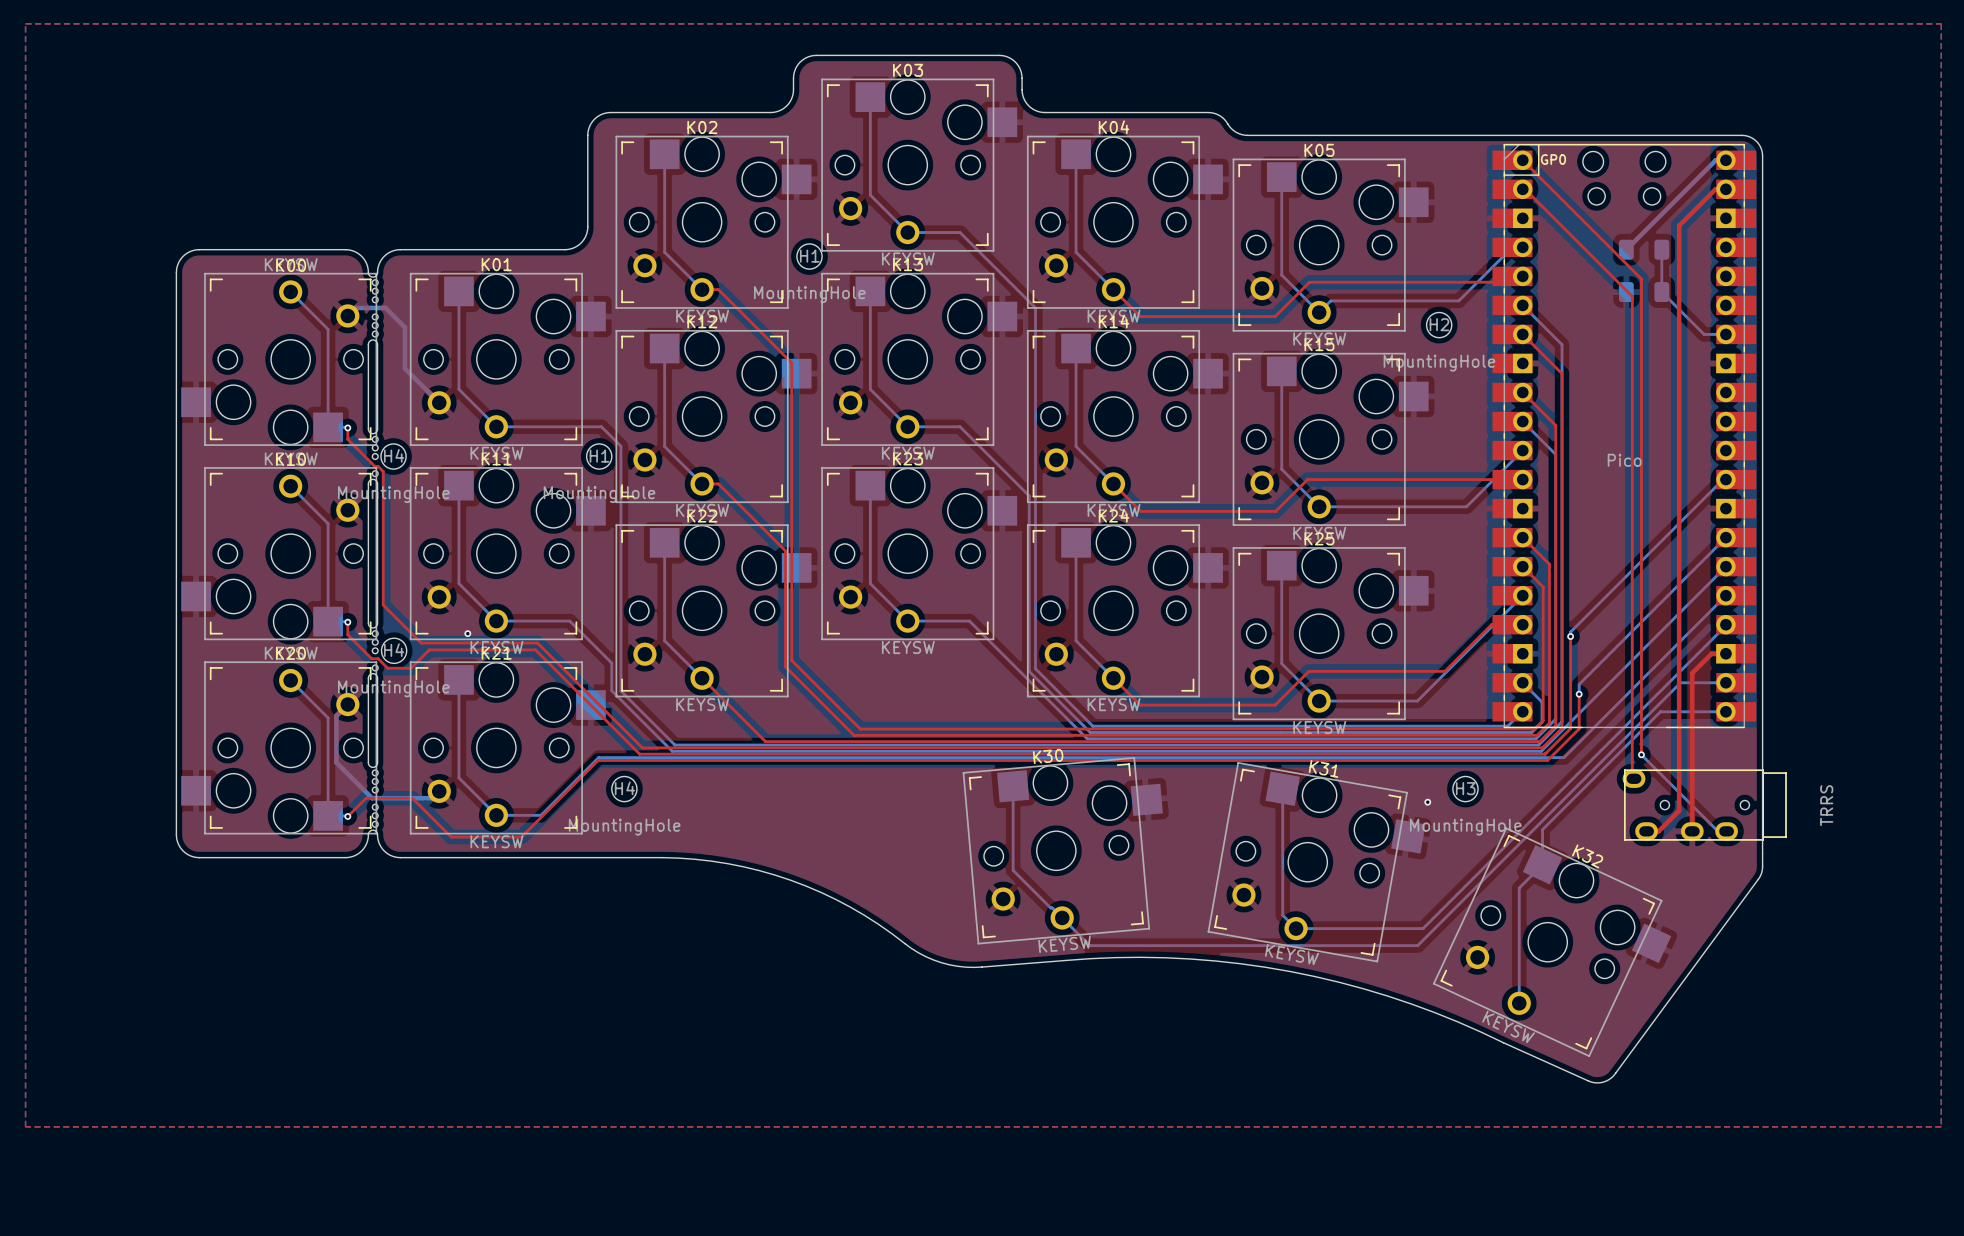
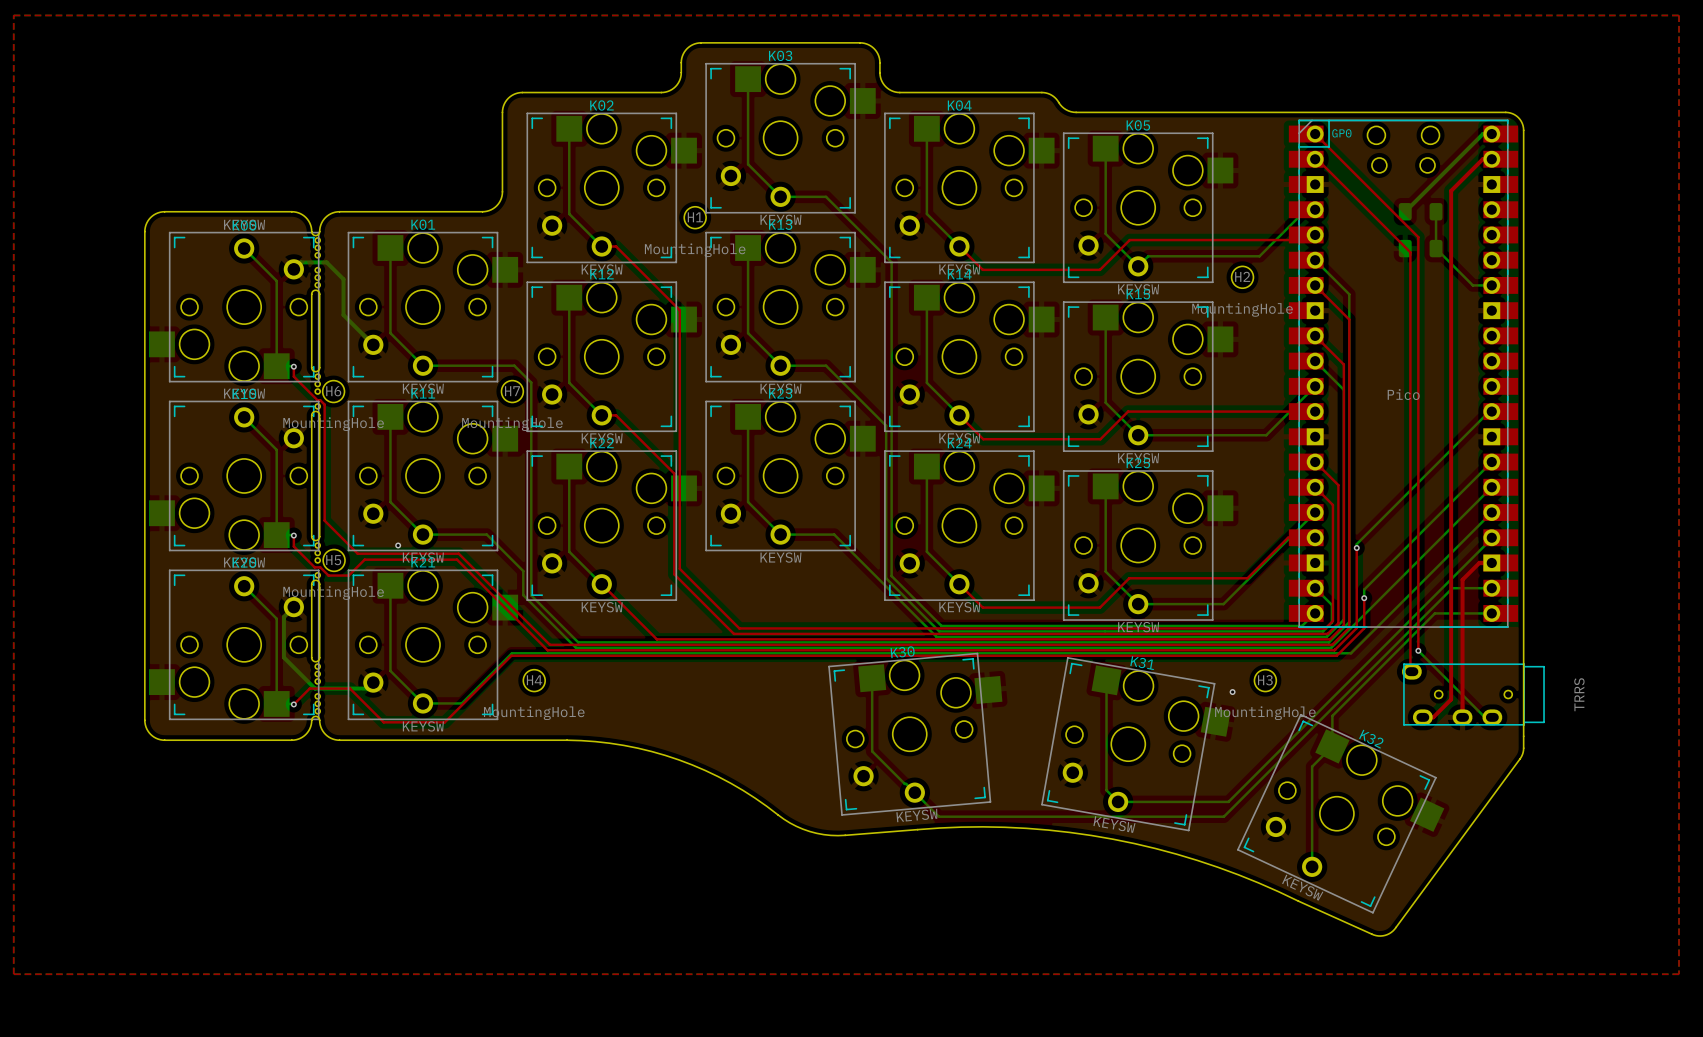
H4 name: H4 (394, 455) -> H6 (333, 391)
H1 name: H1 (599, 456) -> H7 (512, 391)
H4 name: H4 (394, 650) -> H5 (333, 560)

